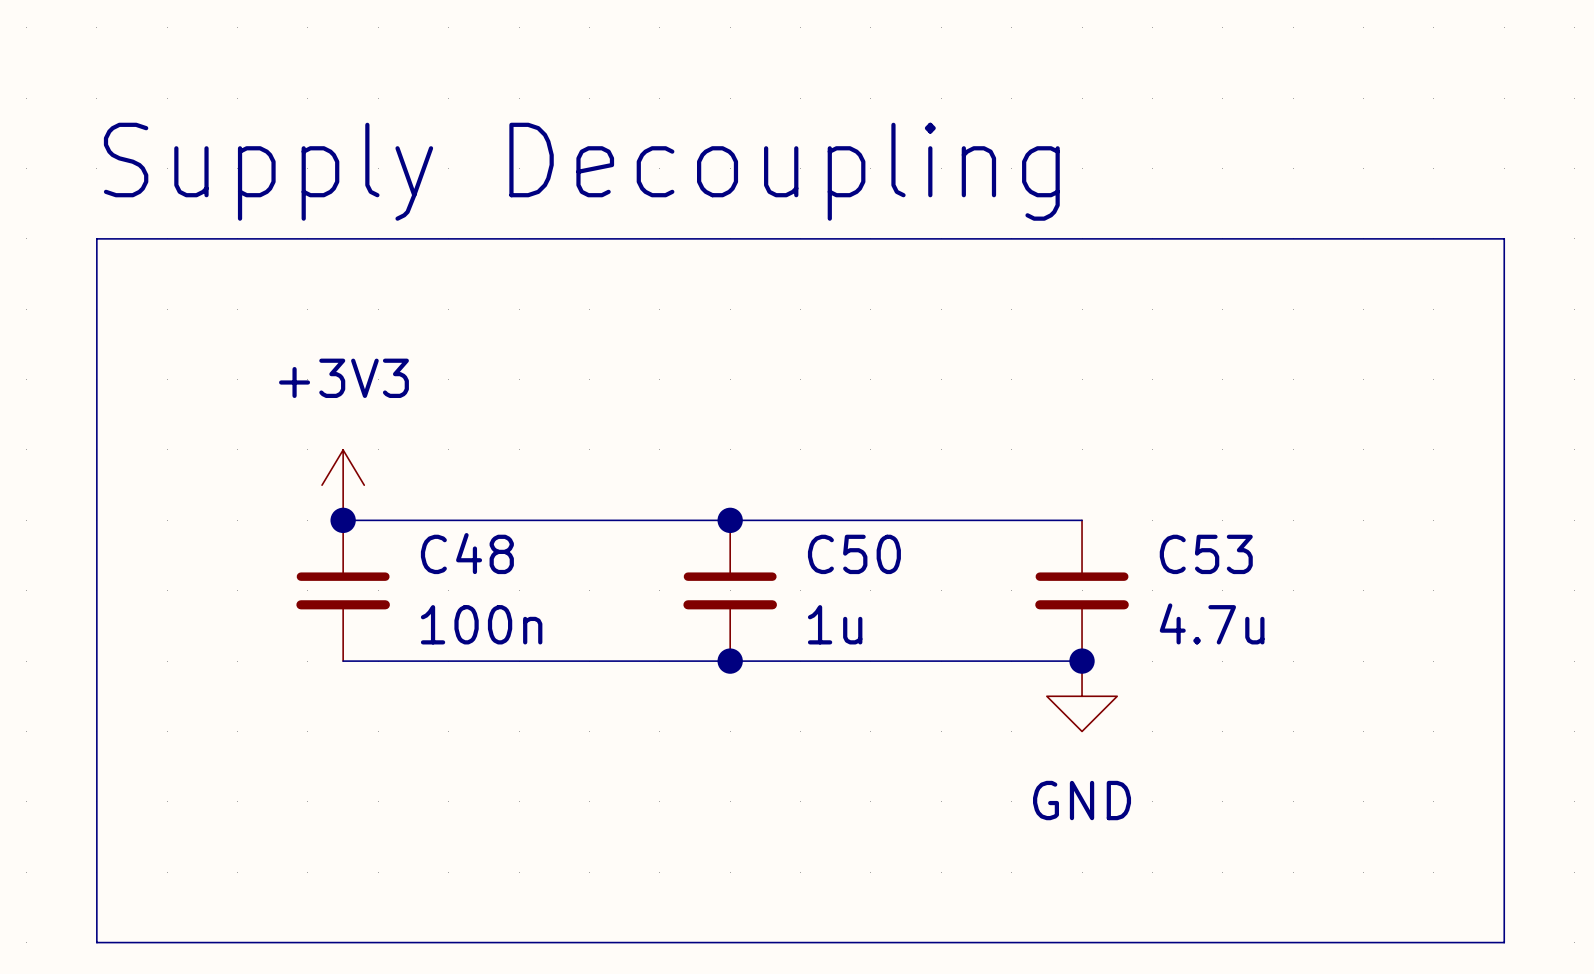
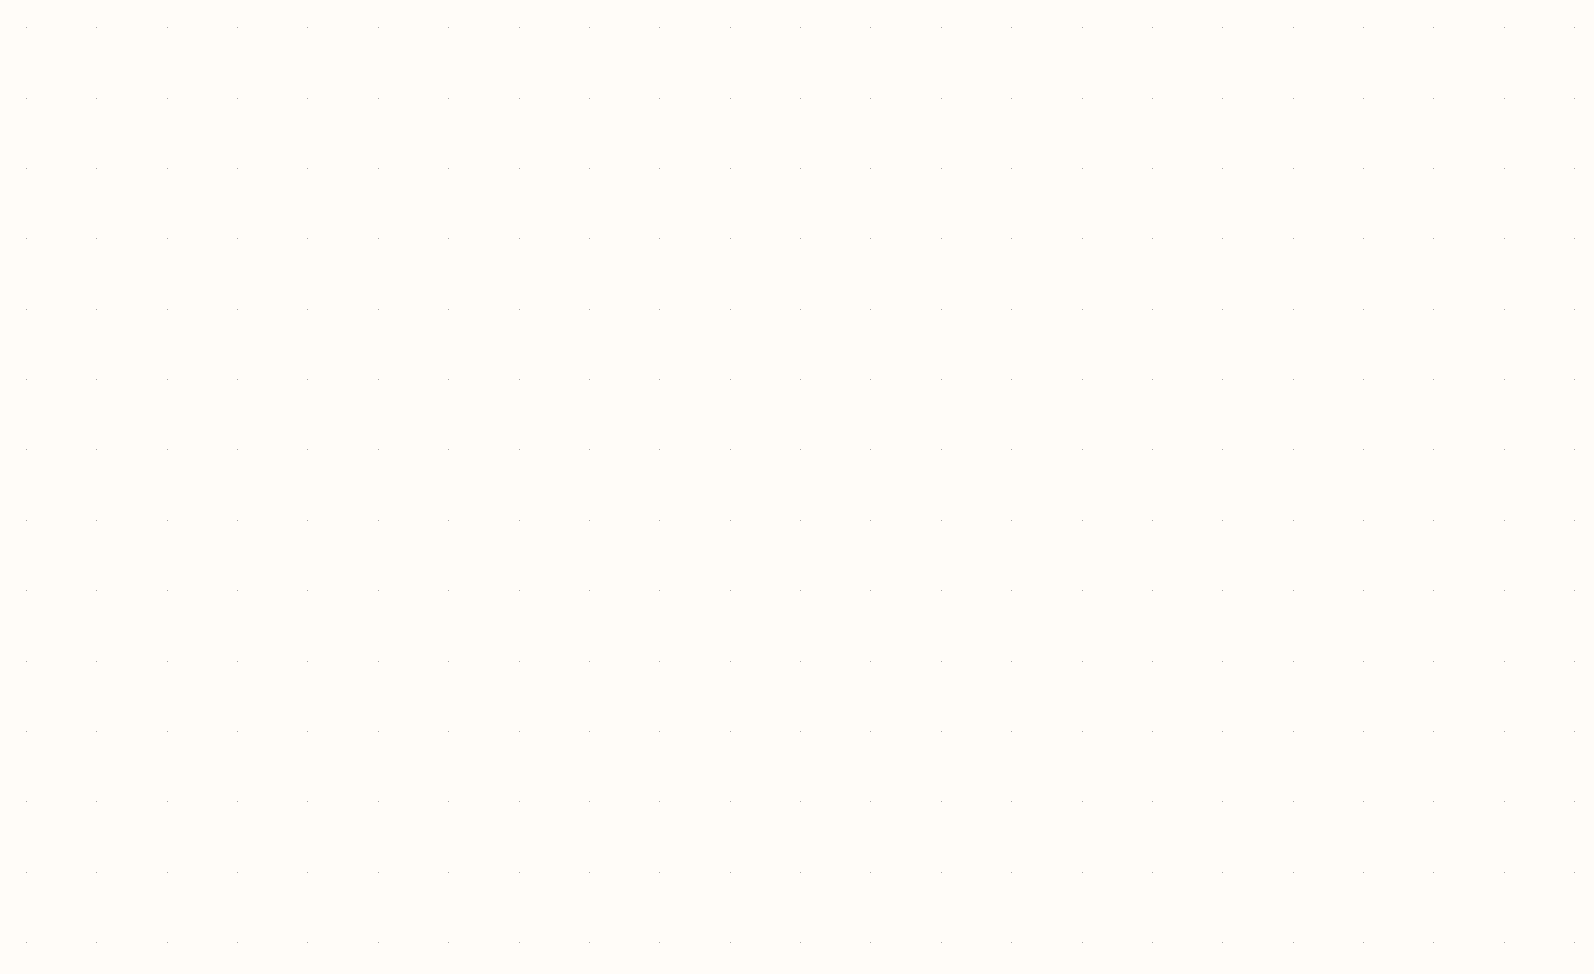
text: Supply Decoupling (581, 171) -> none
line: (96, 238) (1504, 238) (1504, 942) (96, 942) (96, 238) -> none
power symbol: +3V3 (343, 485) -> none
wire: (343, 520) (1082, 520) -> none
junction: (343, 520) -> none
junction: (730, 520) -> none
C48: 100n (343, 590) -> none
C50: 1u (730, 590) -> none
C53: 4.7u (1082, 590) -> none
wire: (343, 661) (1082, 661) -> none
junction: (730, 661) -> none
junction: (1082, 661) -> none
power symbol: GND (1082, 696) -> none

